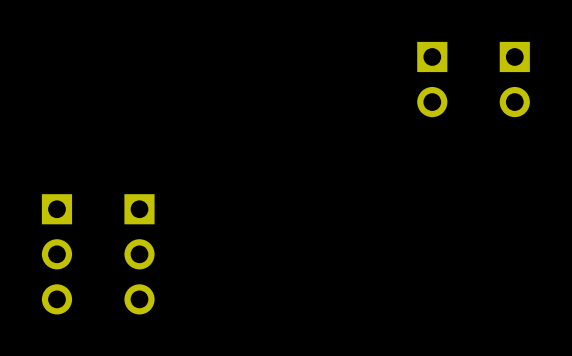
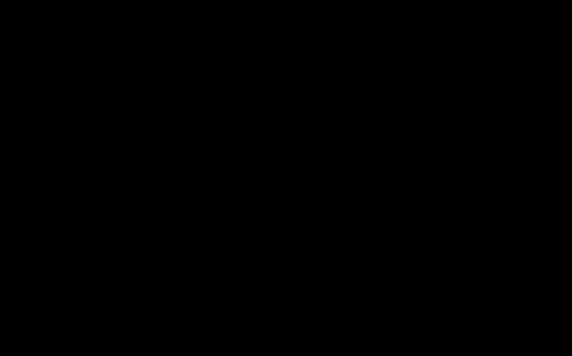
part: (432, 79) -> none
part: (514, 79) -> none
part: (56, 254) -> none
part: (139, 254) -> none

